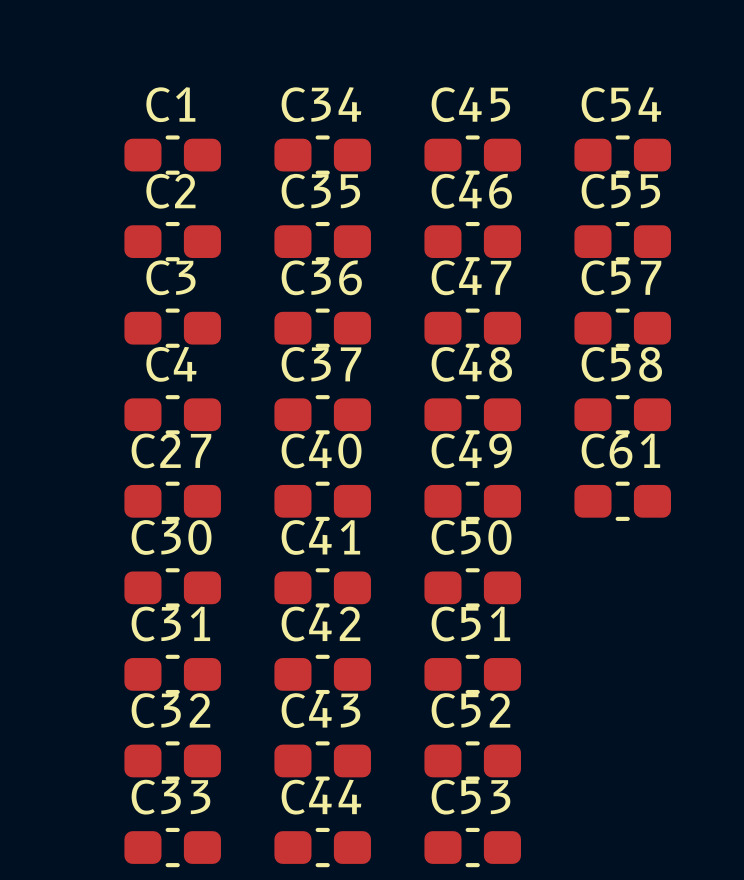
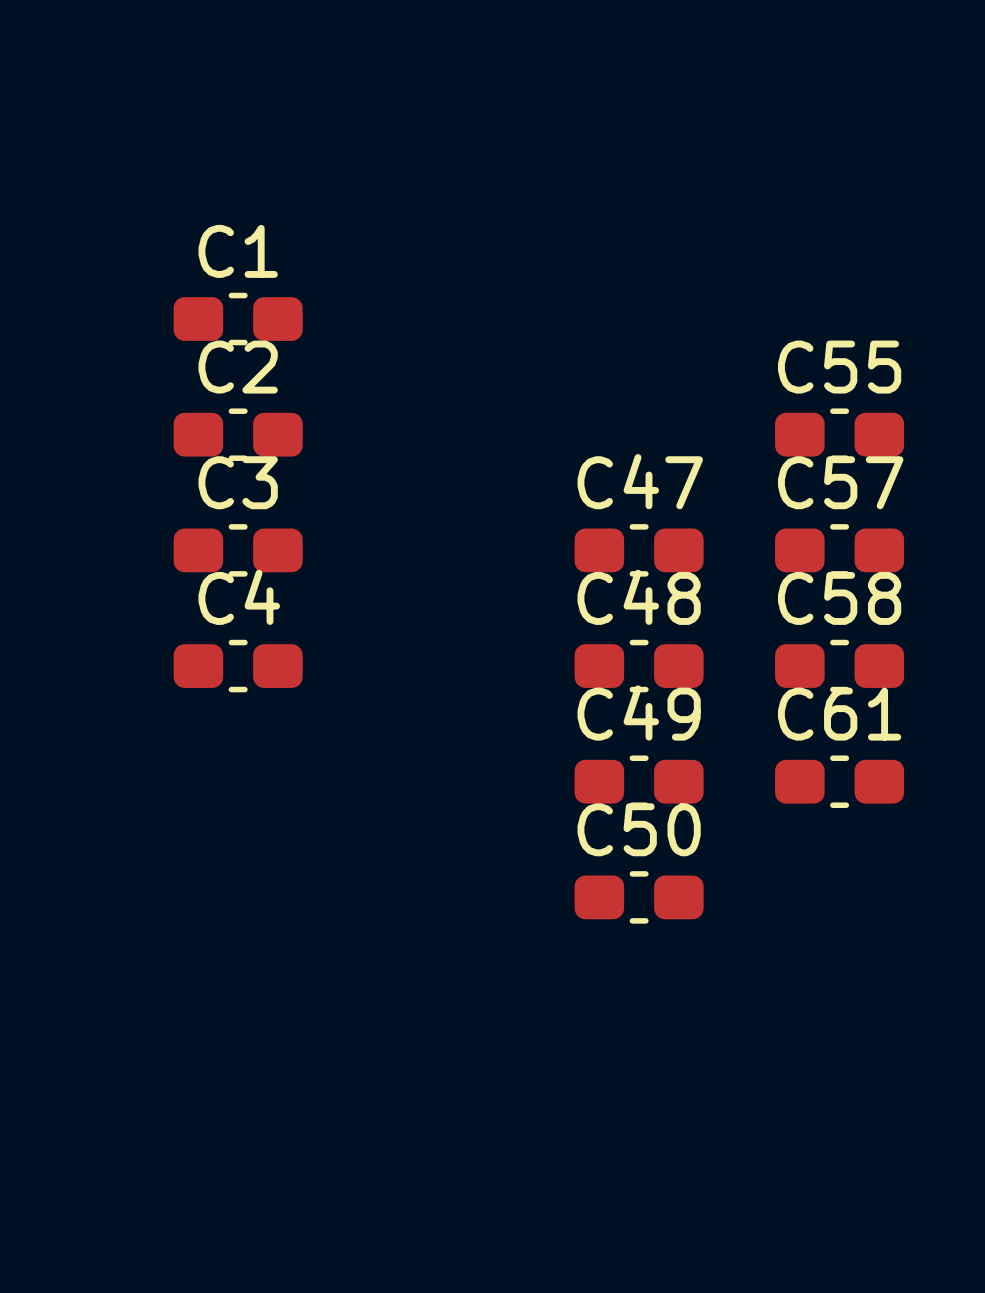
C34: (322, 155) -> none
C45: (472, 155) -> none
C54: (622, 155) -> none
C35: (322, 241) -> none
C46: (472, 241) -> none
C36: (322, 328) -> none
C37: (322, 414) -> none
C27: (172, 501) -> none
C40: (322, 501) -> none
C30: (172, 587) -> none
C41: (322, 587) -> none
C31: (172, 674) -> none
C42: (322, 674) -> none
C51: (472, 674) -> none
C32: (172, 760) -> none
C43: (322, 760) -> none
C52: (472, 760) -> none
C33: (172, 847) -> none
C44: (322, 847) -> none
C53: (472, 847) -> none

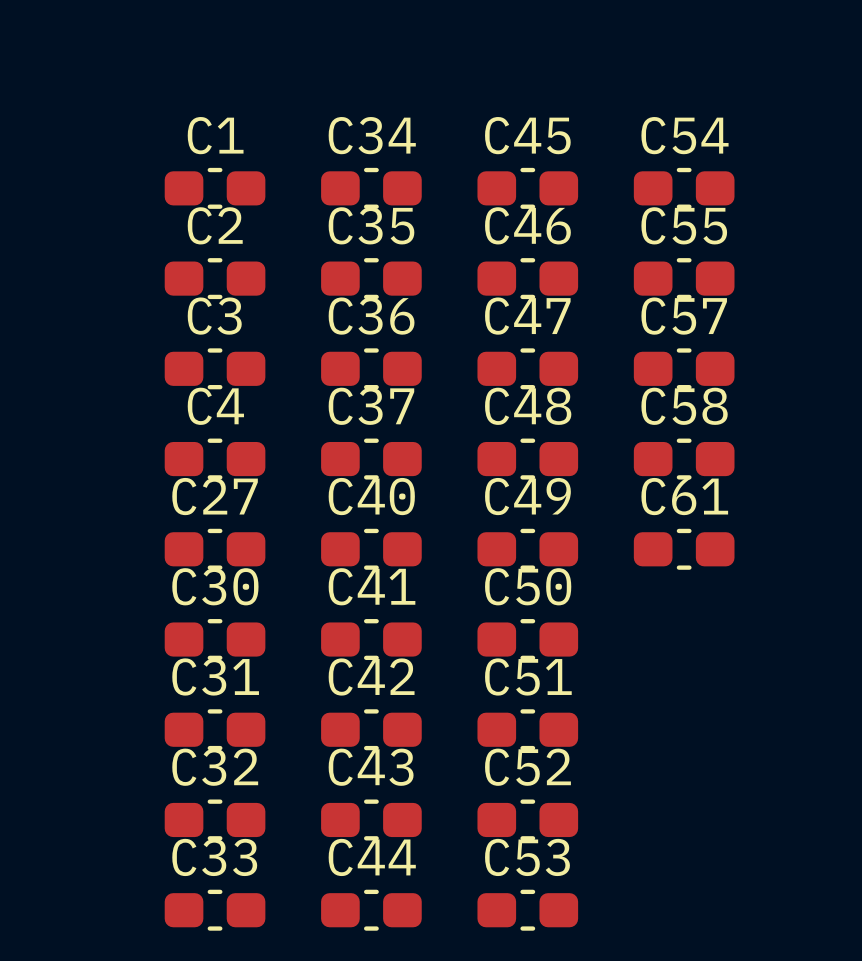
C34: none -> (371, 188)
C45: none -> (527, 188)
C54: none -> (684, 188)
C35: none -> (371, 278)
C46: none -> (527, 278)
C36: none -> (371, 368)
C37: none -> (371, 459)
C27: none -> (215, 549)
C40: none -> (371, 549)
C30: none -> (215, 639)
C41: none -> (371, 639)
C31: none -> (215, 729)
C42: none -> (371, 729)
C51: none -> (527, 729)
C32: none -> (215, 819)
C43: none -> (371, 819)
C52: none -> (527, 819)
C33: none -> (215, 910)
C44: none -> (371, 910)
C53: none -> (527, 910)

